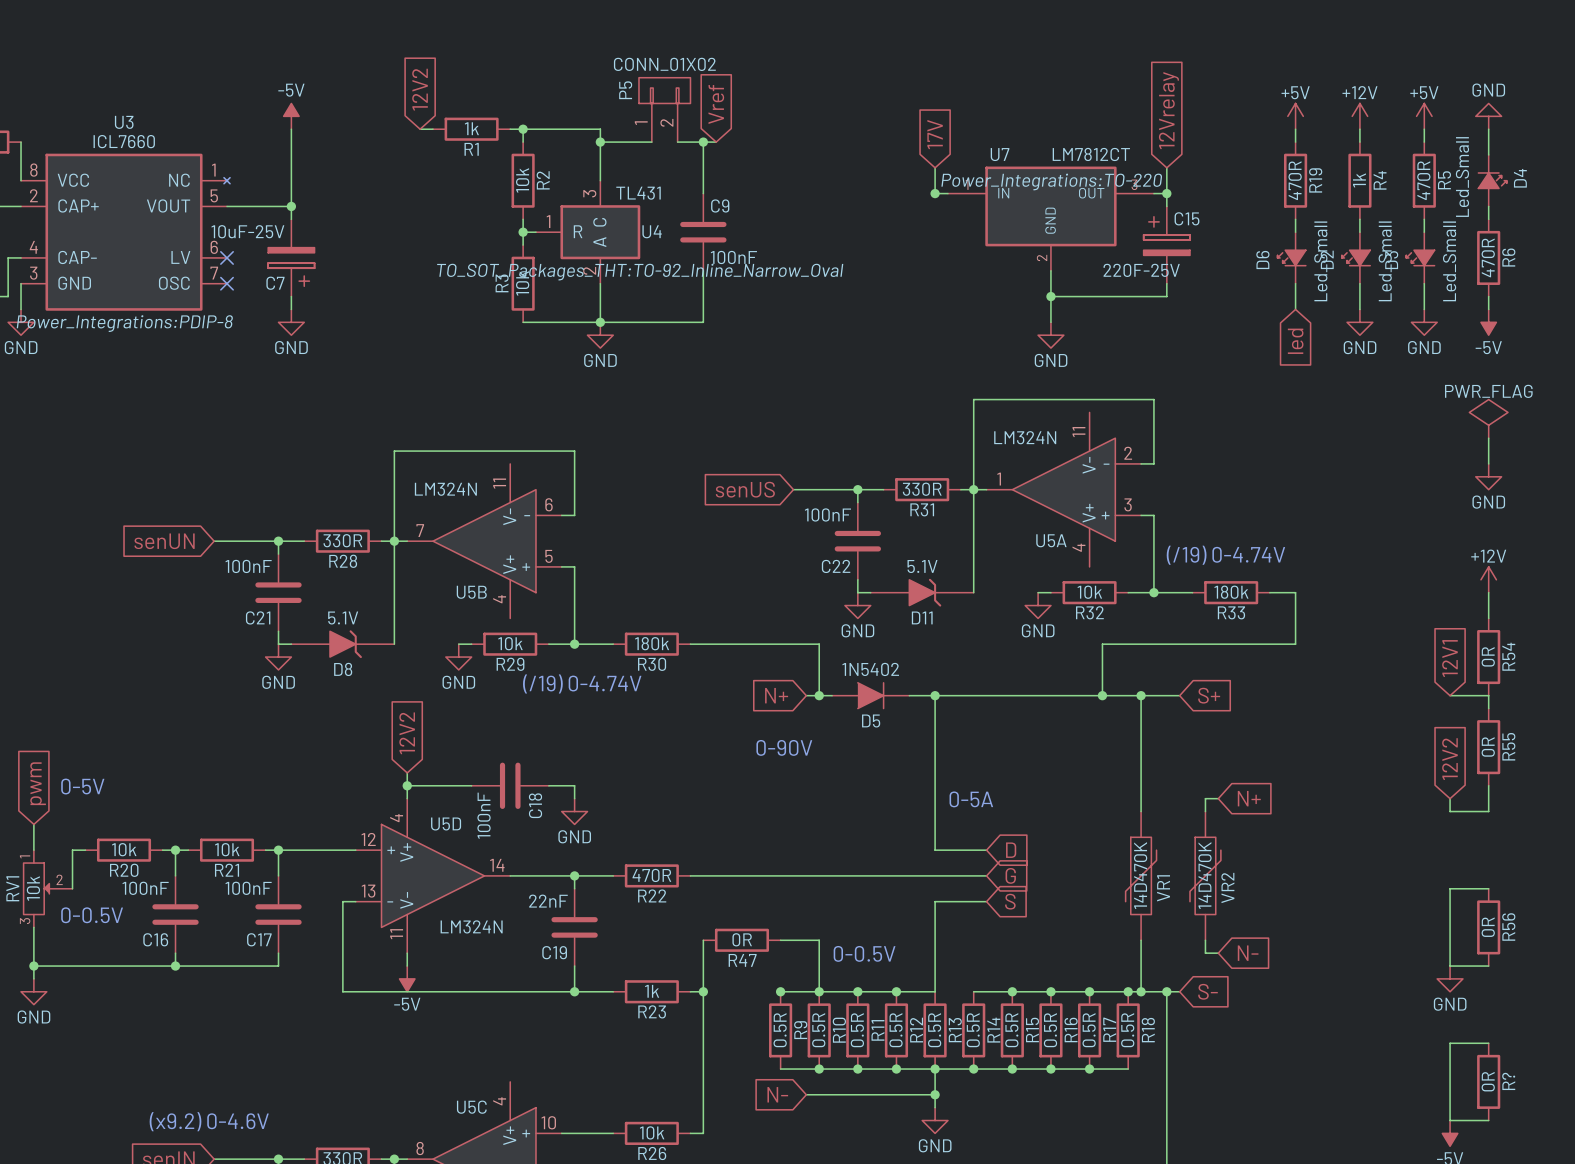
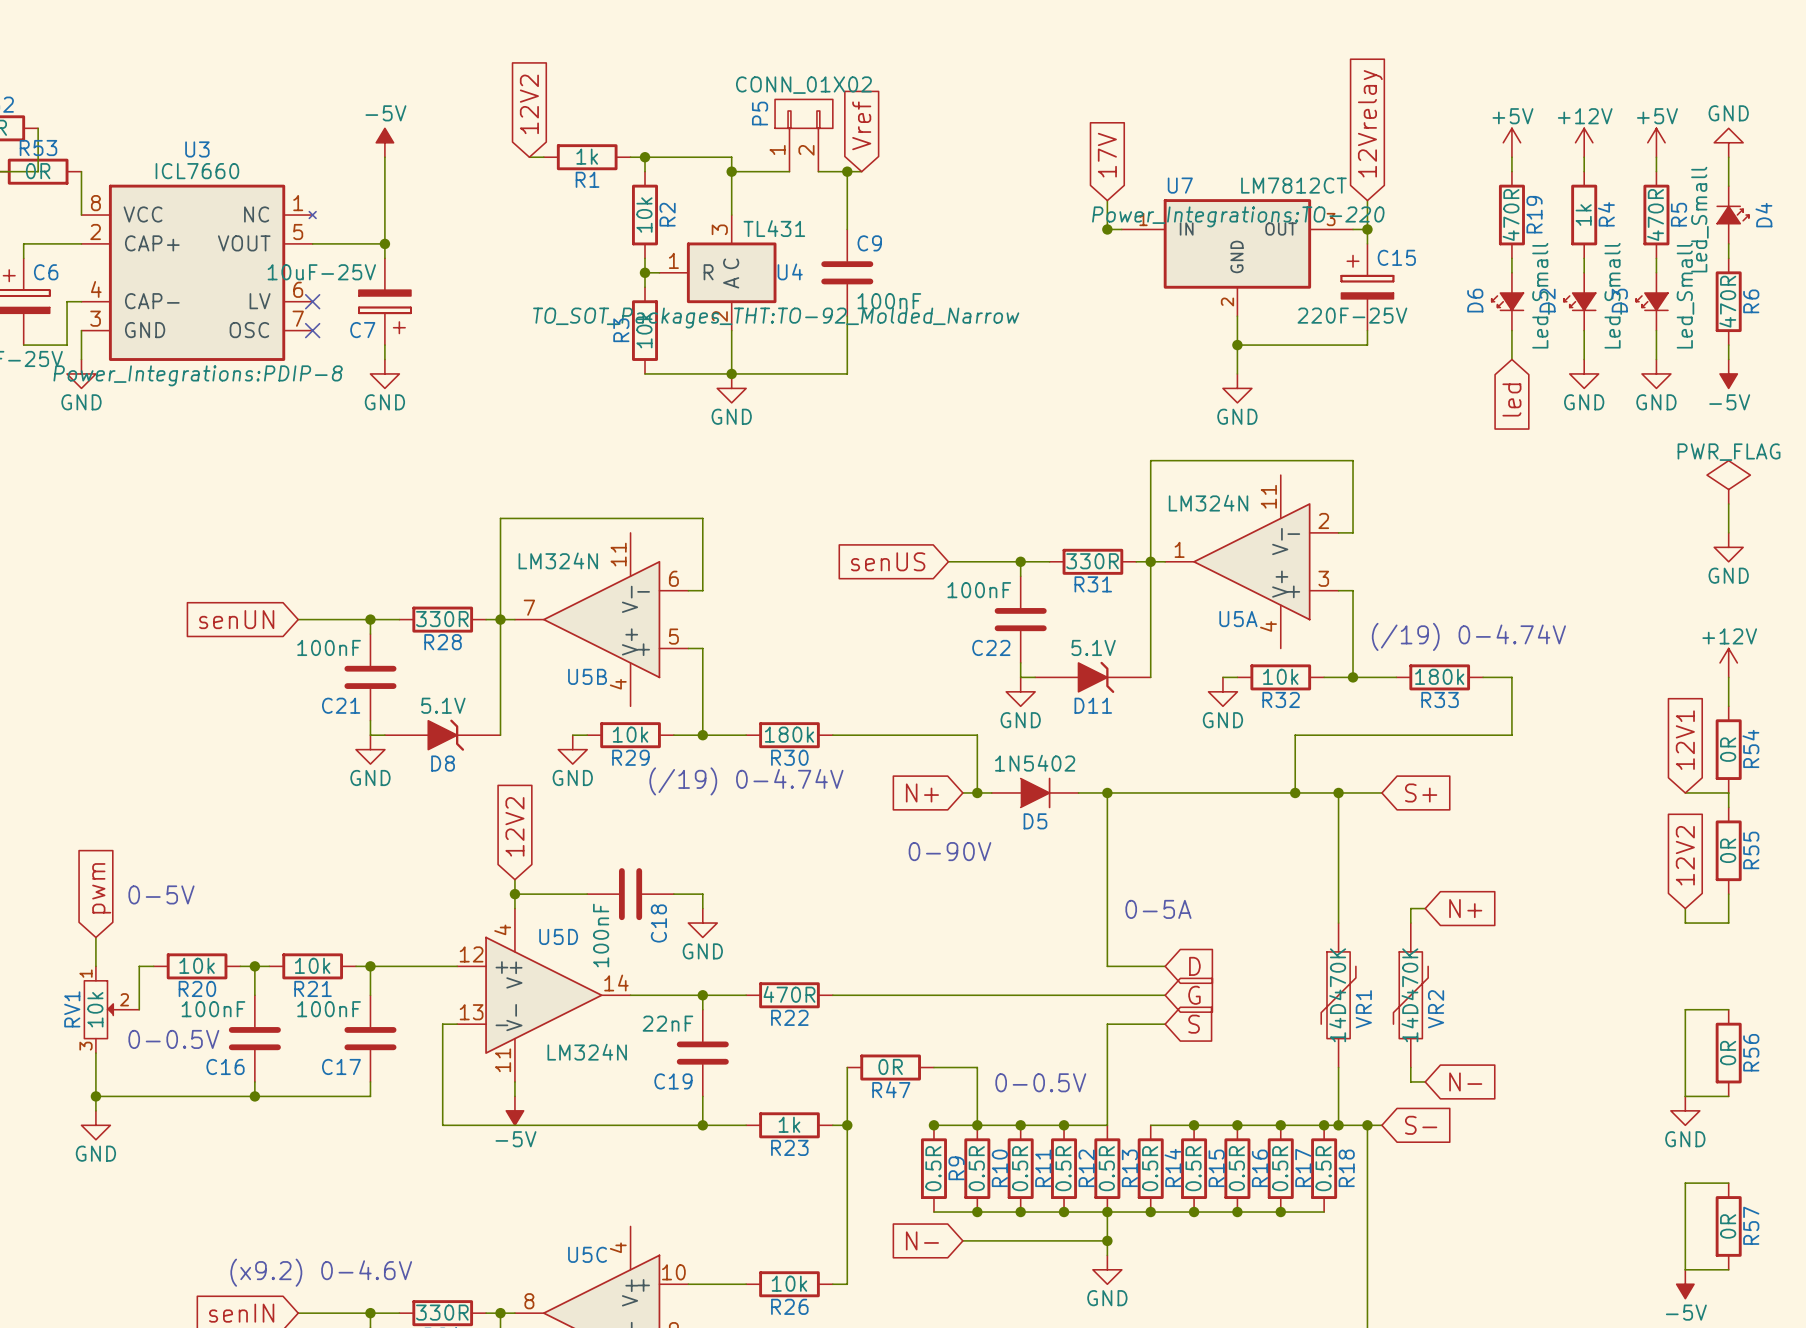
U4 text: TO_SOT_Packages_THT:TO-92_Inline_Narrow_Oval (640, 272) -> TO_SOT_Packages_THT:TO-92_Molded_Narrow (776, 318)
R? name: R? (1508, 1081) -> R57 (1751, 1225)

